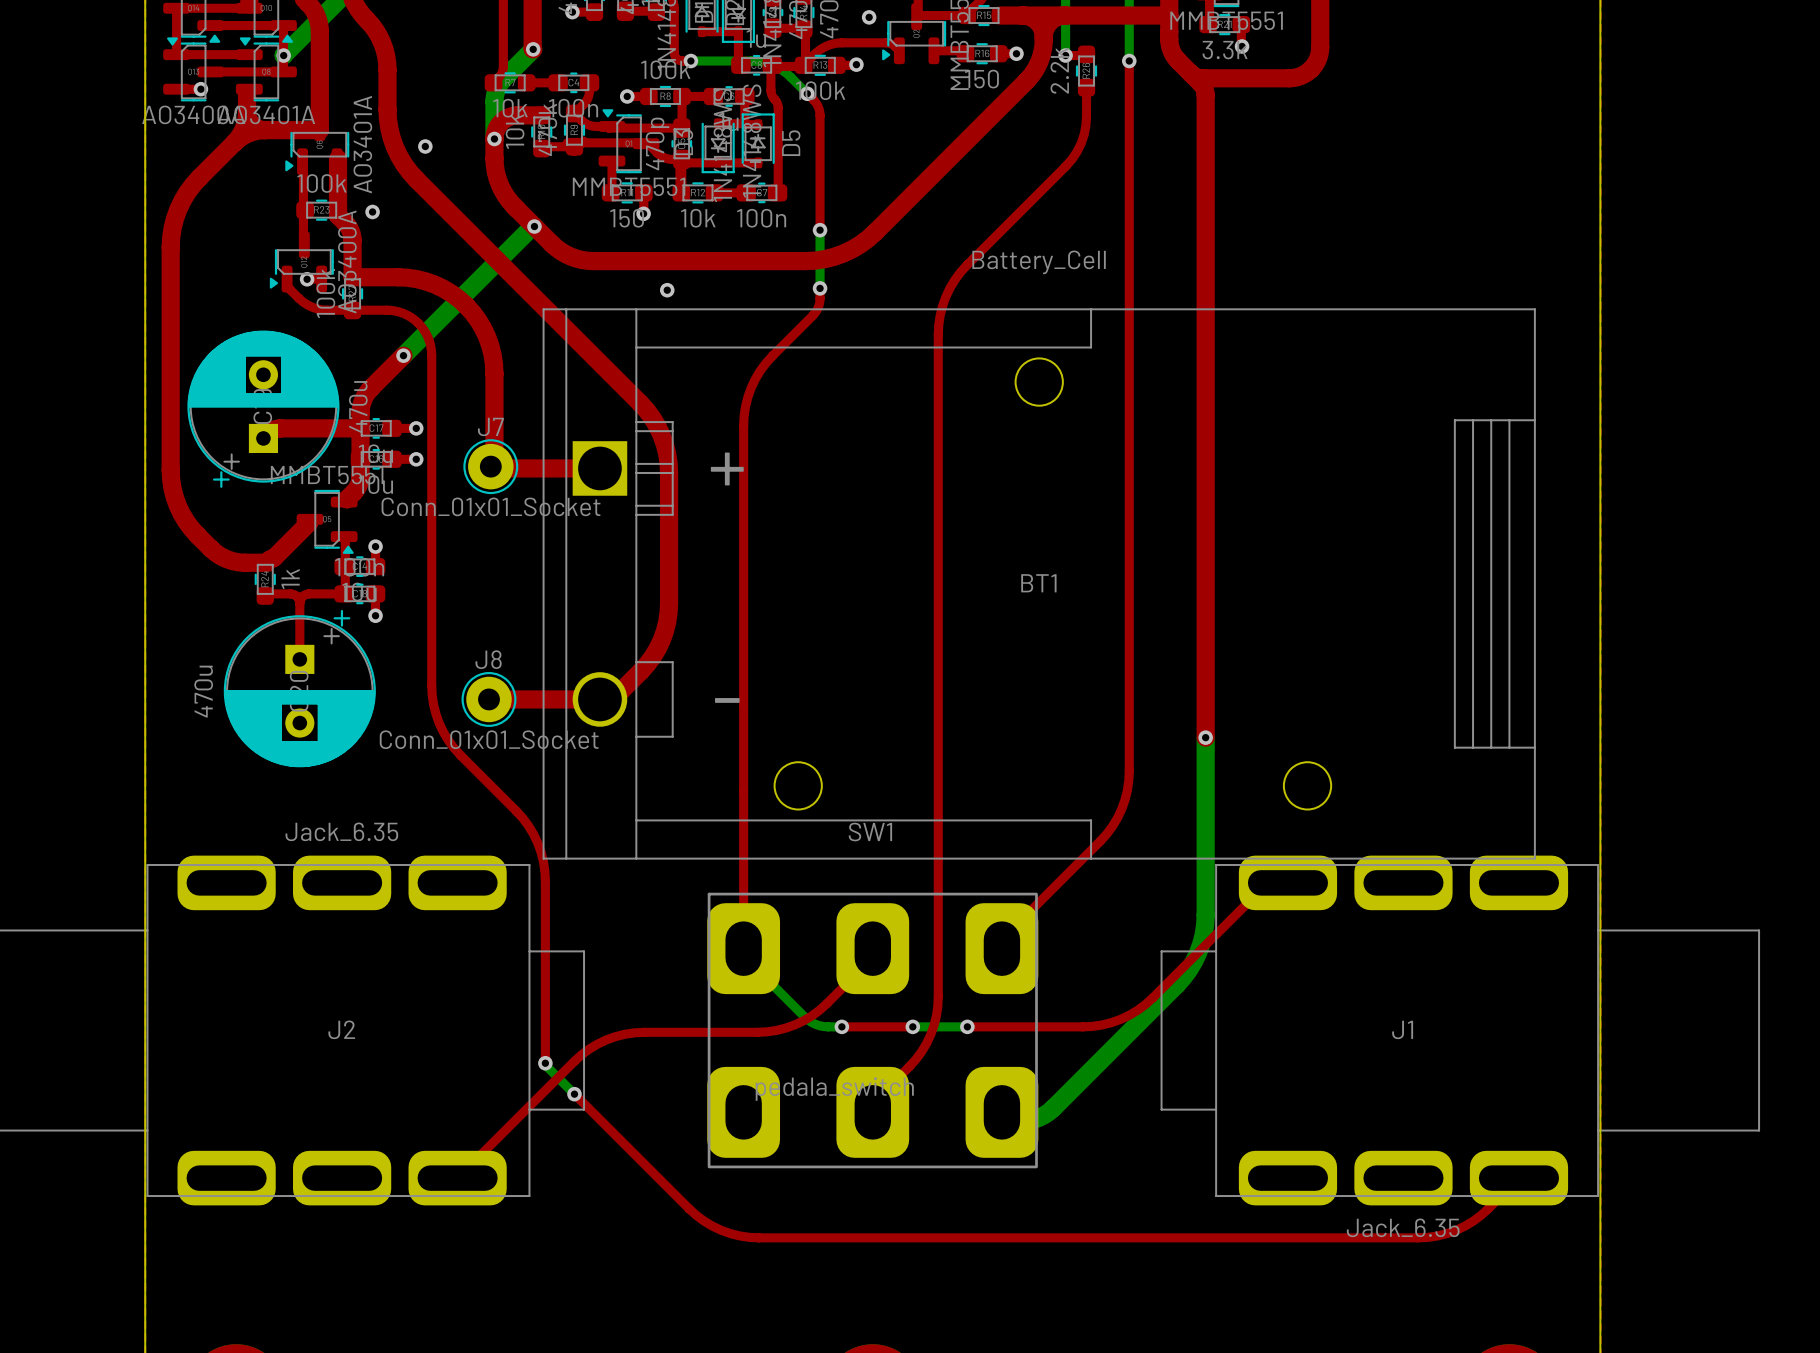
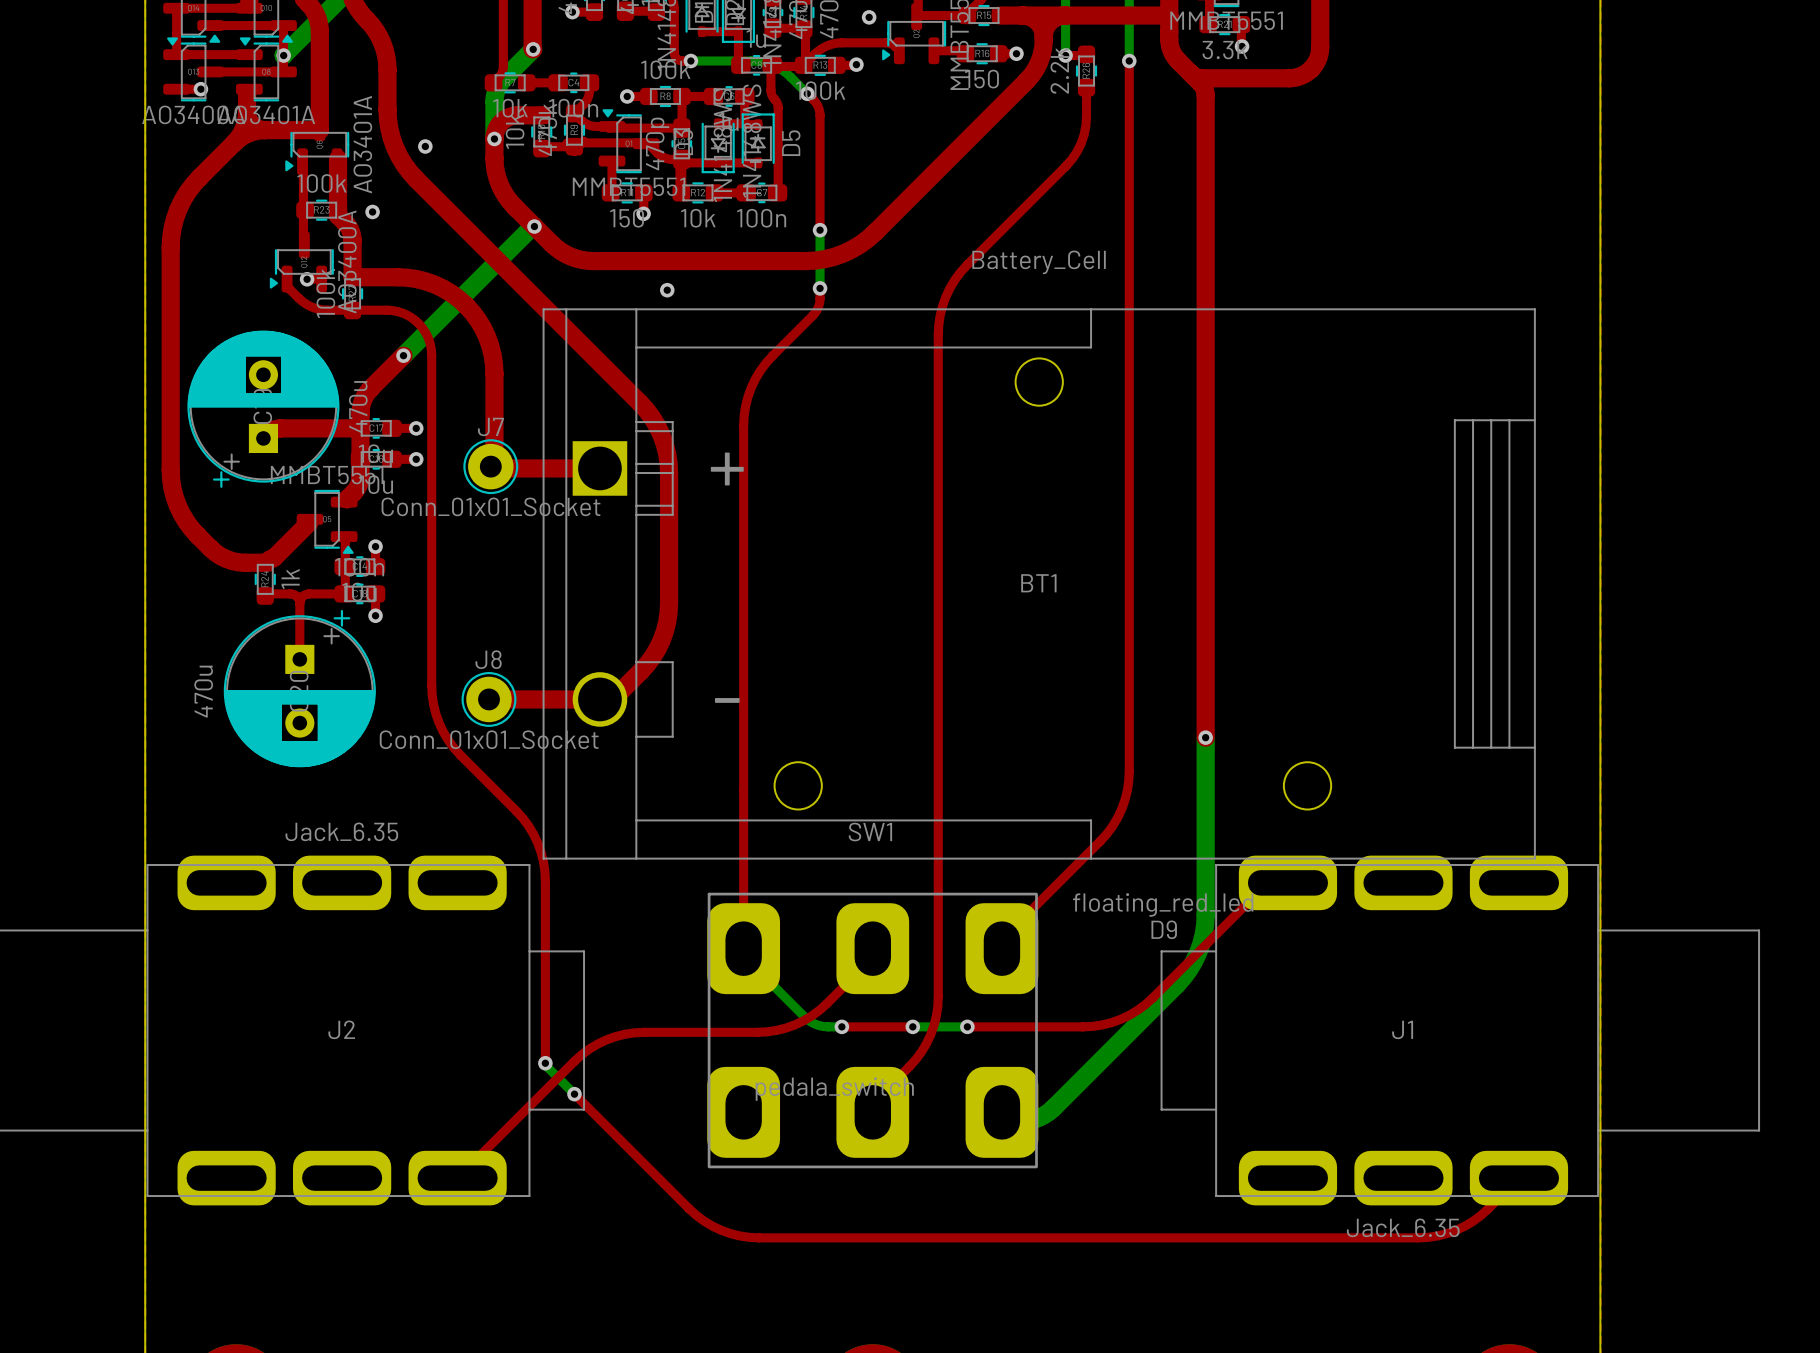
D9: none -> floating_red_led (1163, 916)

